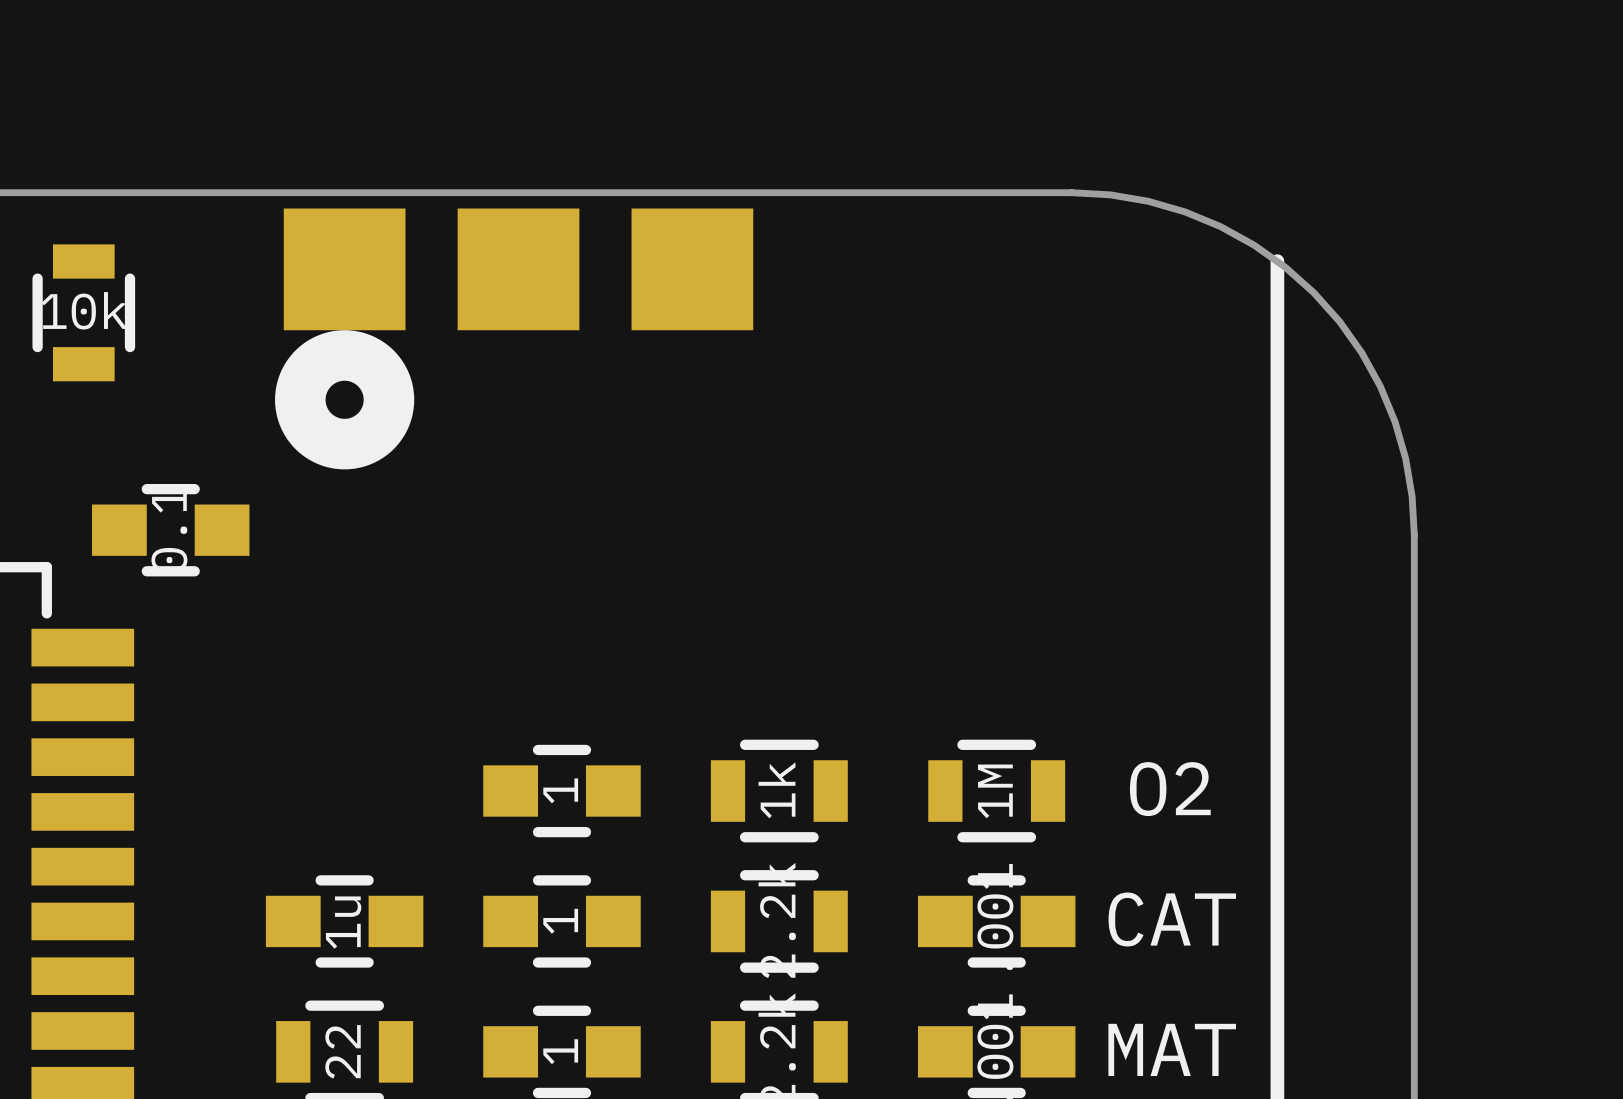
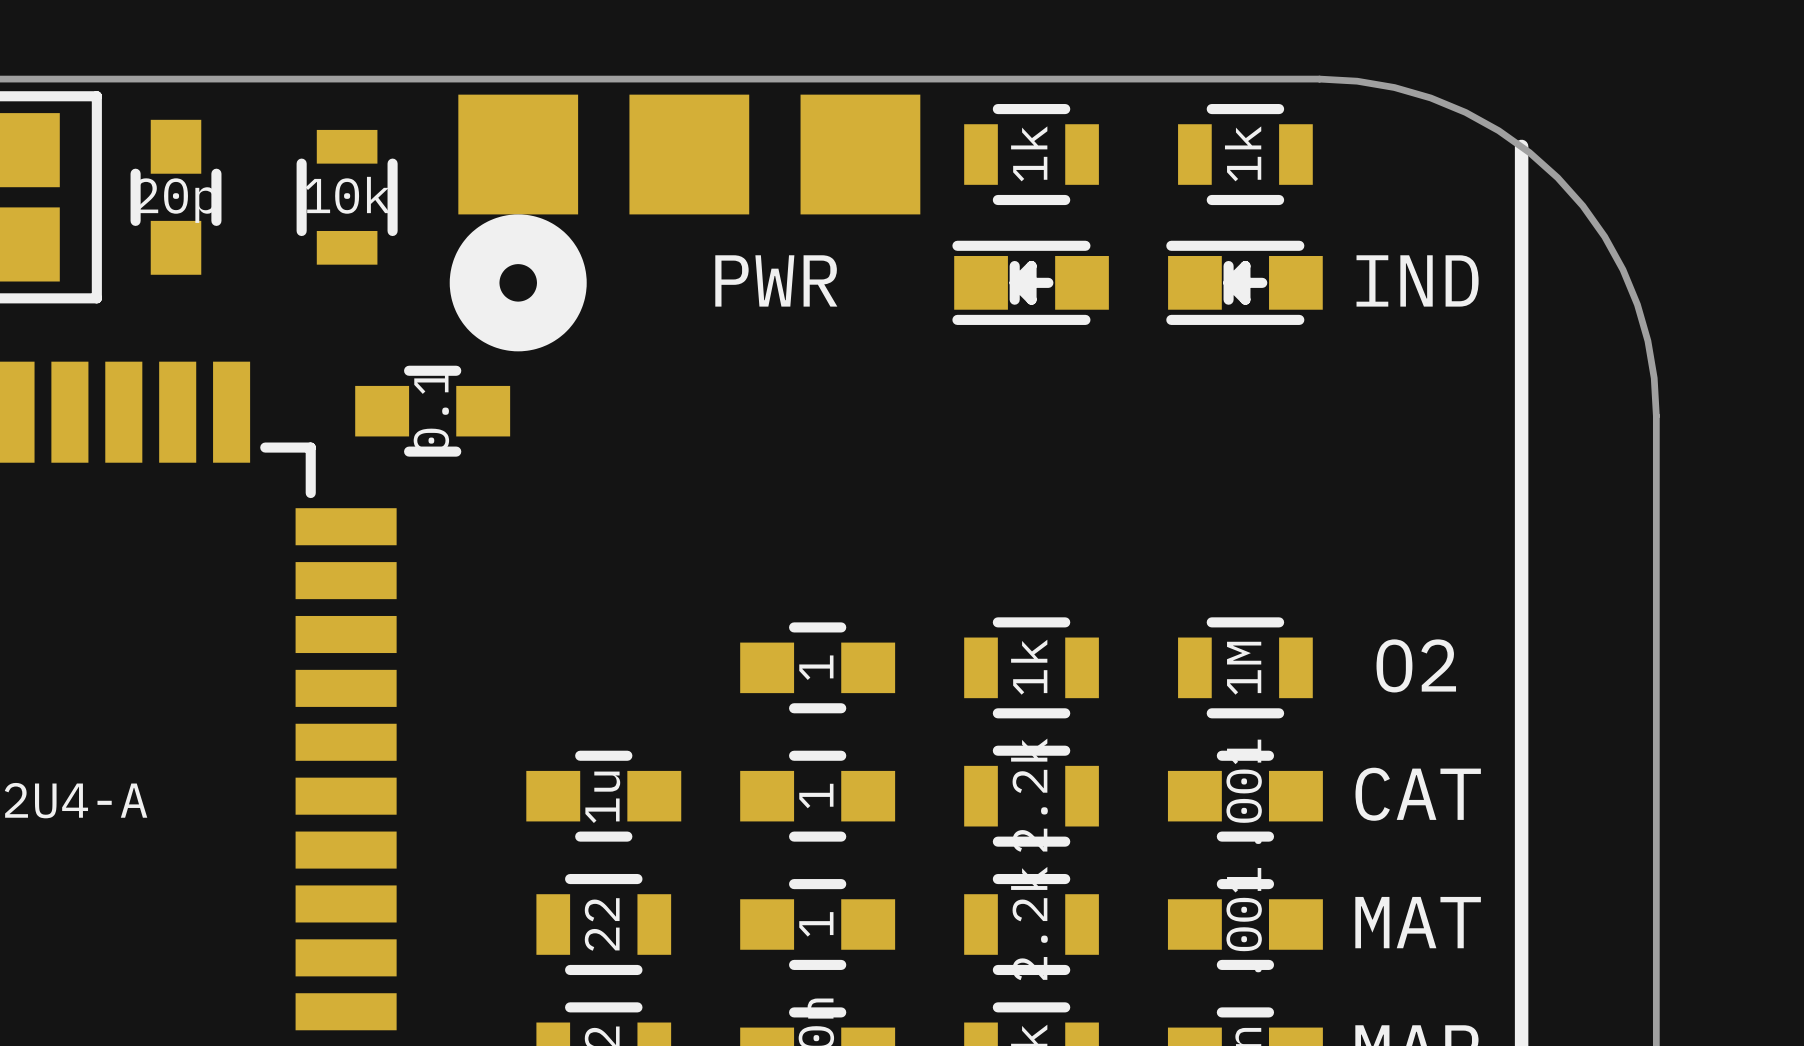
part: none -> 1k (1031, 154)
part: none -> 1k (1245, 154)
part position: (514, 338) -> (685, 222)
text: none -> PWR (776, 280)
text: none -> IND (1417, 280)
part: none -> (1030, 282)
part: none -> (1244, 282)

